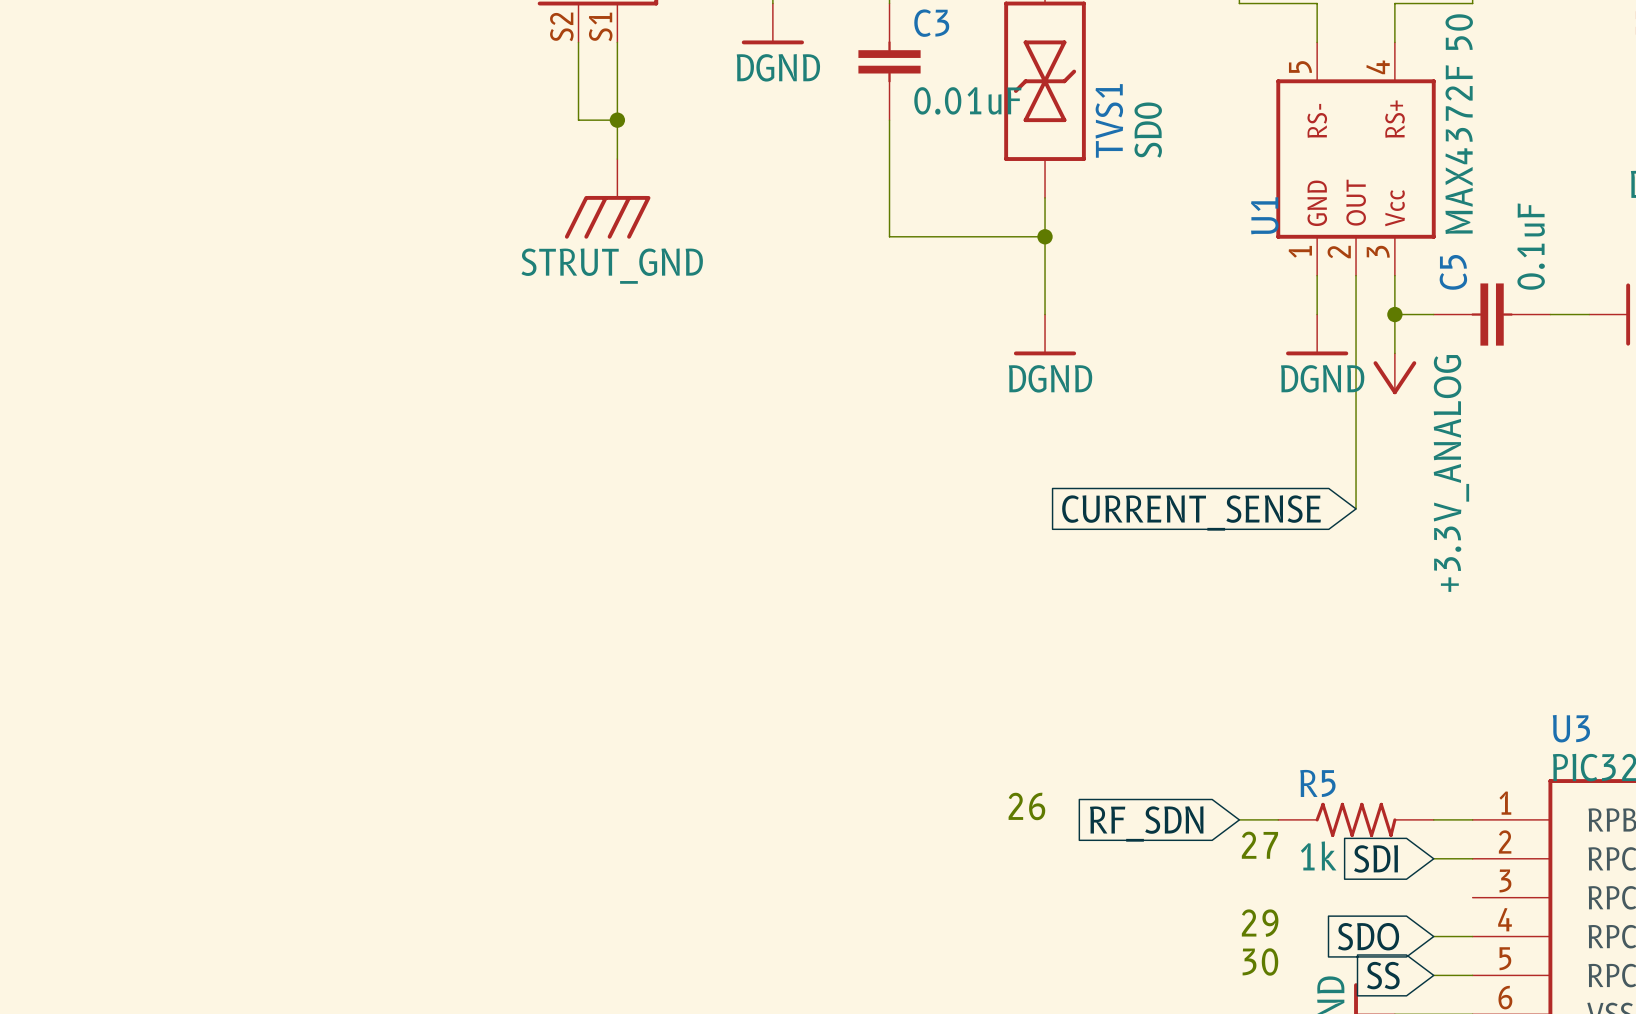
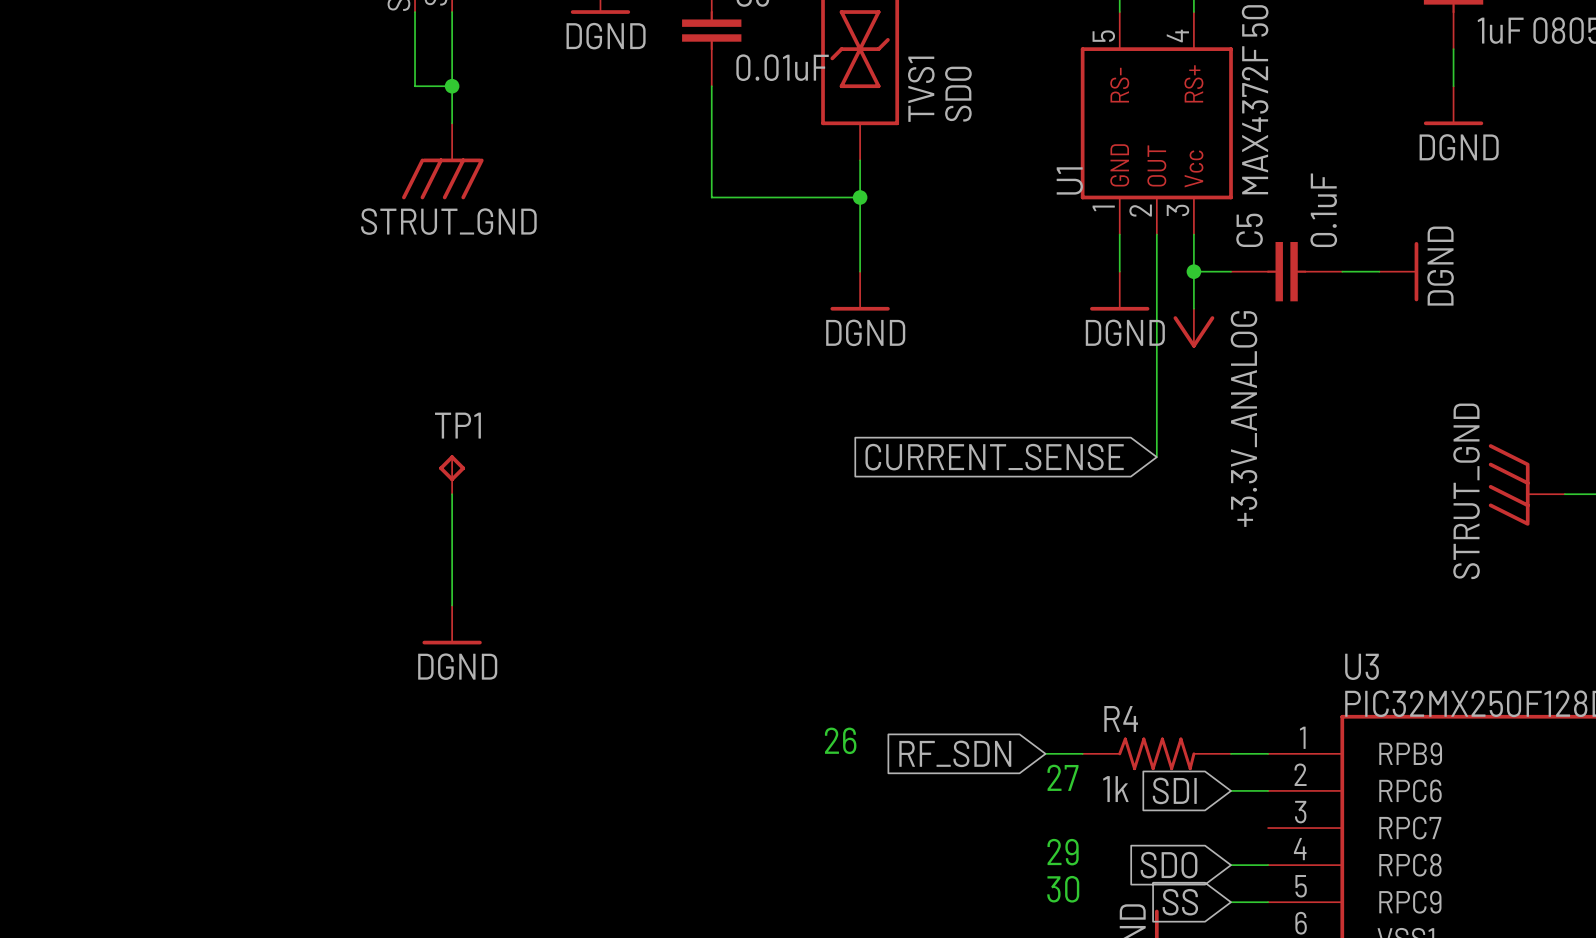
TP1: none -> (452, 474)
wire: none -> (452, 494) (452, 605)
power symbol: none -> DGND (452, 624)
R5 name: R5 (1317, 783) -> R4 (1121, 718)

